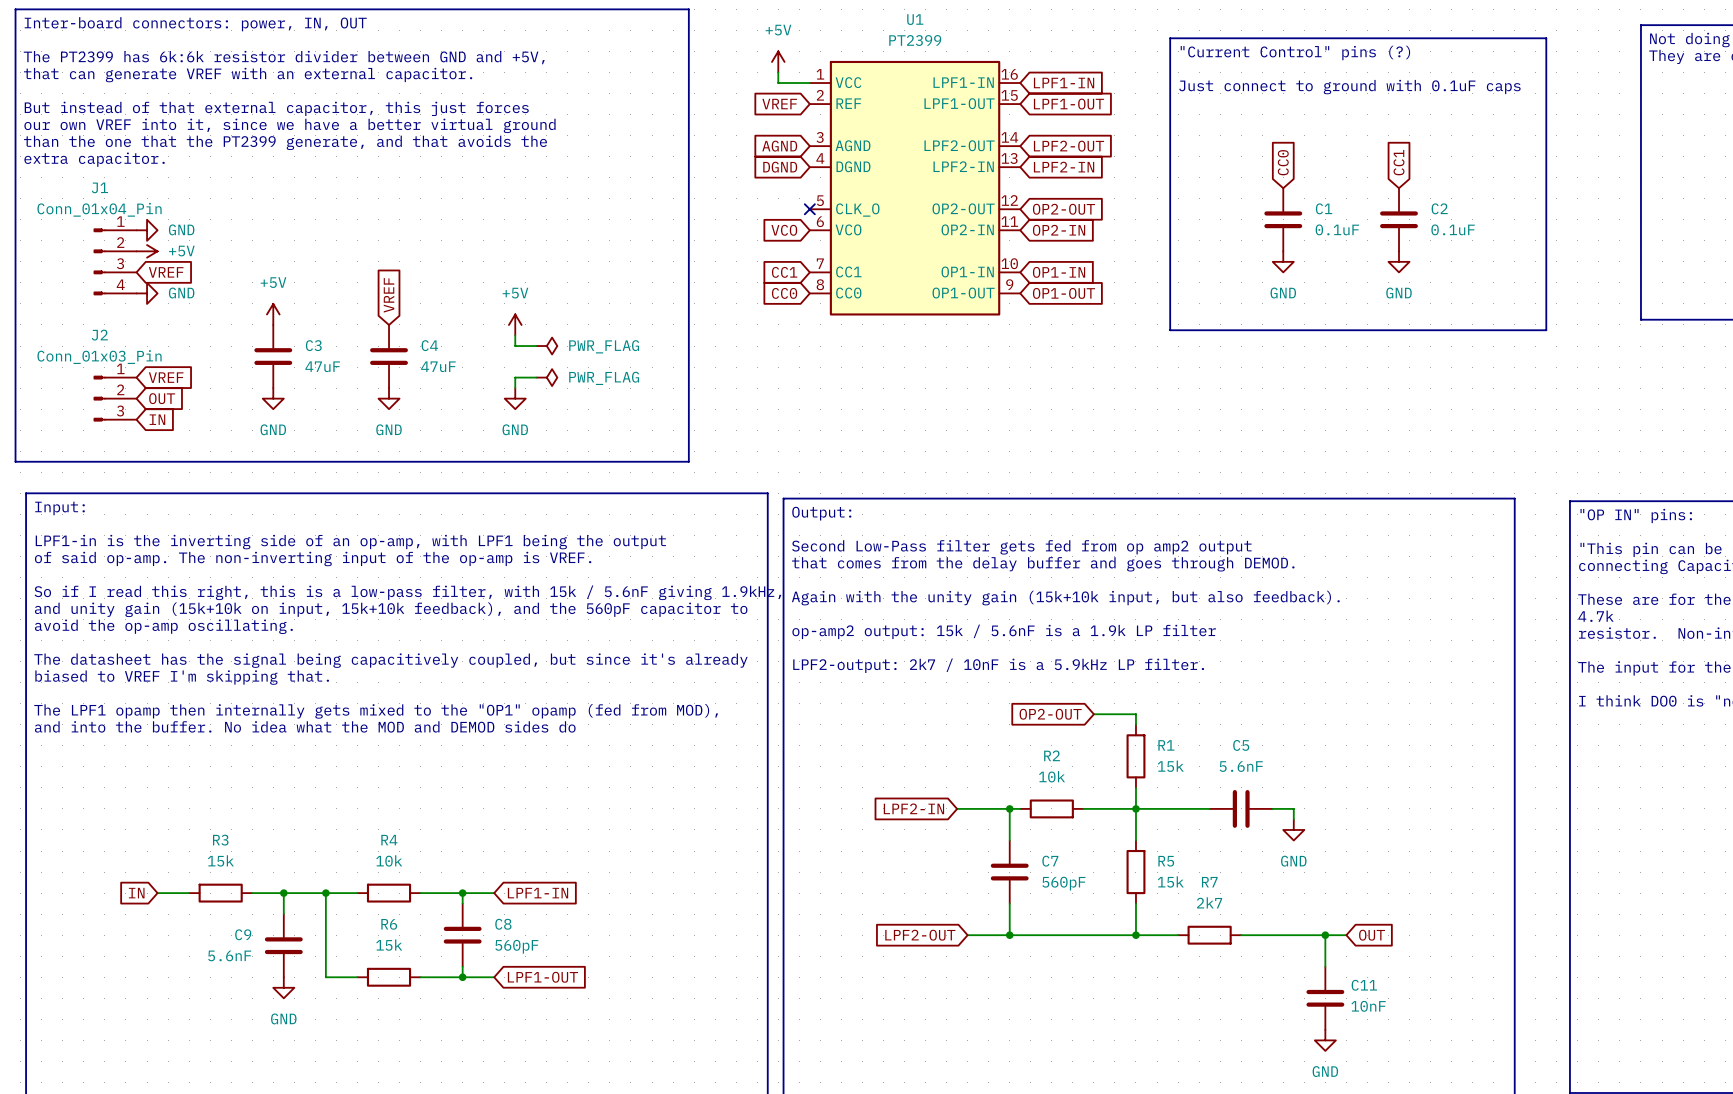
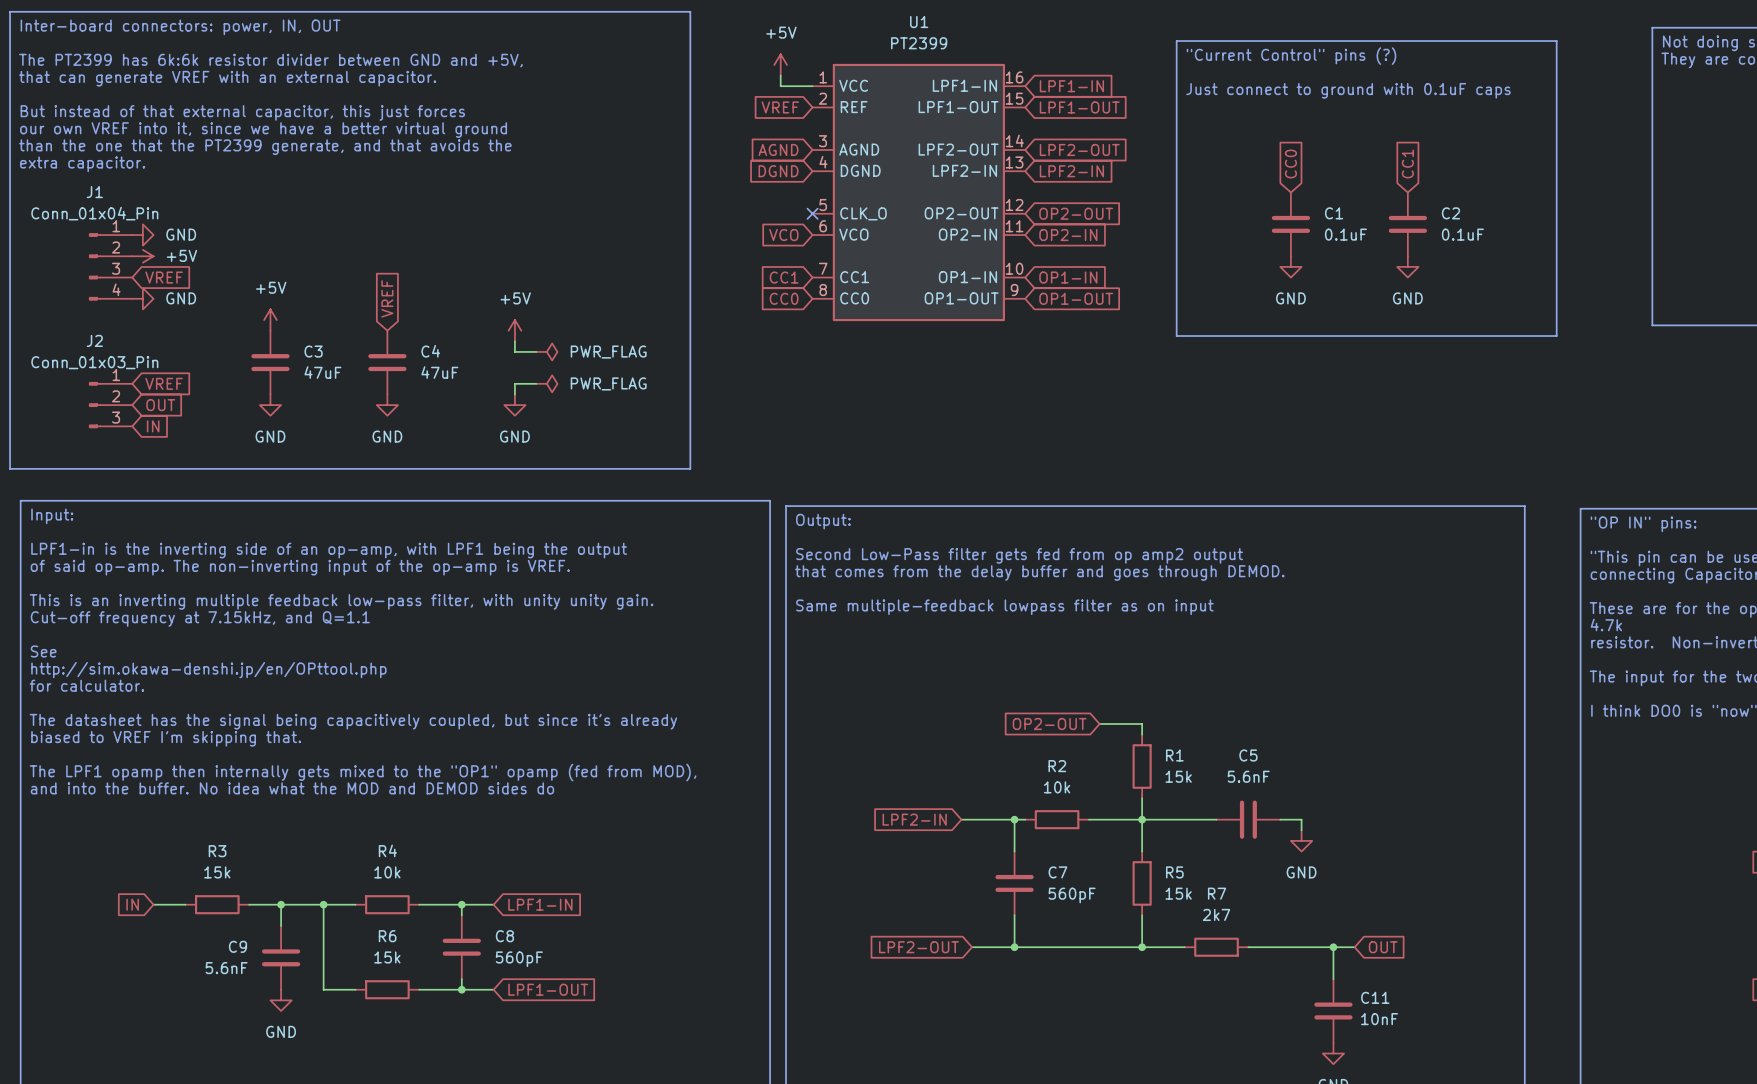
text: So if I read this right, this is a low-pass filter, with 15k / 5.6nF giving 1.9kHz, (407, 592) -> This is an inverting multiple feedback low-pass filter, with unity unity gain. (341, 601)
text: Again with the unity gain (15k+10k input, but also feedback). (1065, 598) -> Same multiple-feedback lowpass filter as on input (1004, 607)
text: and unity gain (15k+10k on input, 15k+10k feedback), and the 560pF capacitor to (391, 609) -> Cut-off frequency at 7.15kHz, and Q=1.1 (200, 619)
text: avoid the op-amp oscillating. (163, 626) -> none
text: op-amp2 output: 15k / 5.6nF is a 1.9k LP filter (1004, 631) -> none
text: none -> See (43, 651)
text: The datasheet has the signal being capacitively coupled, but since it's already (390, 660) -> http://sim.okawa-denshi.jp/en/OPttool.php (208, 670)
text: LPF2-output: 2k7 / 10nF is a 5.9kHz LP filter. (998, 665) -> none
text: biased to VREF I'm skipping that. (182, 677) -> for calculator. (86, 685)
text: The LPF1 opamp then internally gets mixed to the "OP1" opamp (fed from MOD), (376, 711) -> The datasheet has the signal being capacitively coupled, but since it's already (353, 721)
text: and into the buffer. No idea what the MOD and DEMOD sides do (305, 726) -> biased to VREF I'm skipping that. (166, 738)
text: none -> The LPF1 opamp then internally gets mixed to the "OP1" opamp (fed from MOD), (363, 772)
text: none -> and into the buffer. No idea what the MOD and DEMOD sides do (292, 788)

